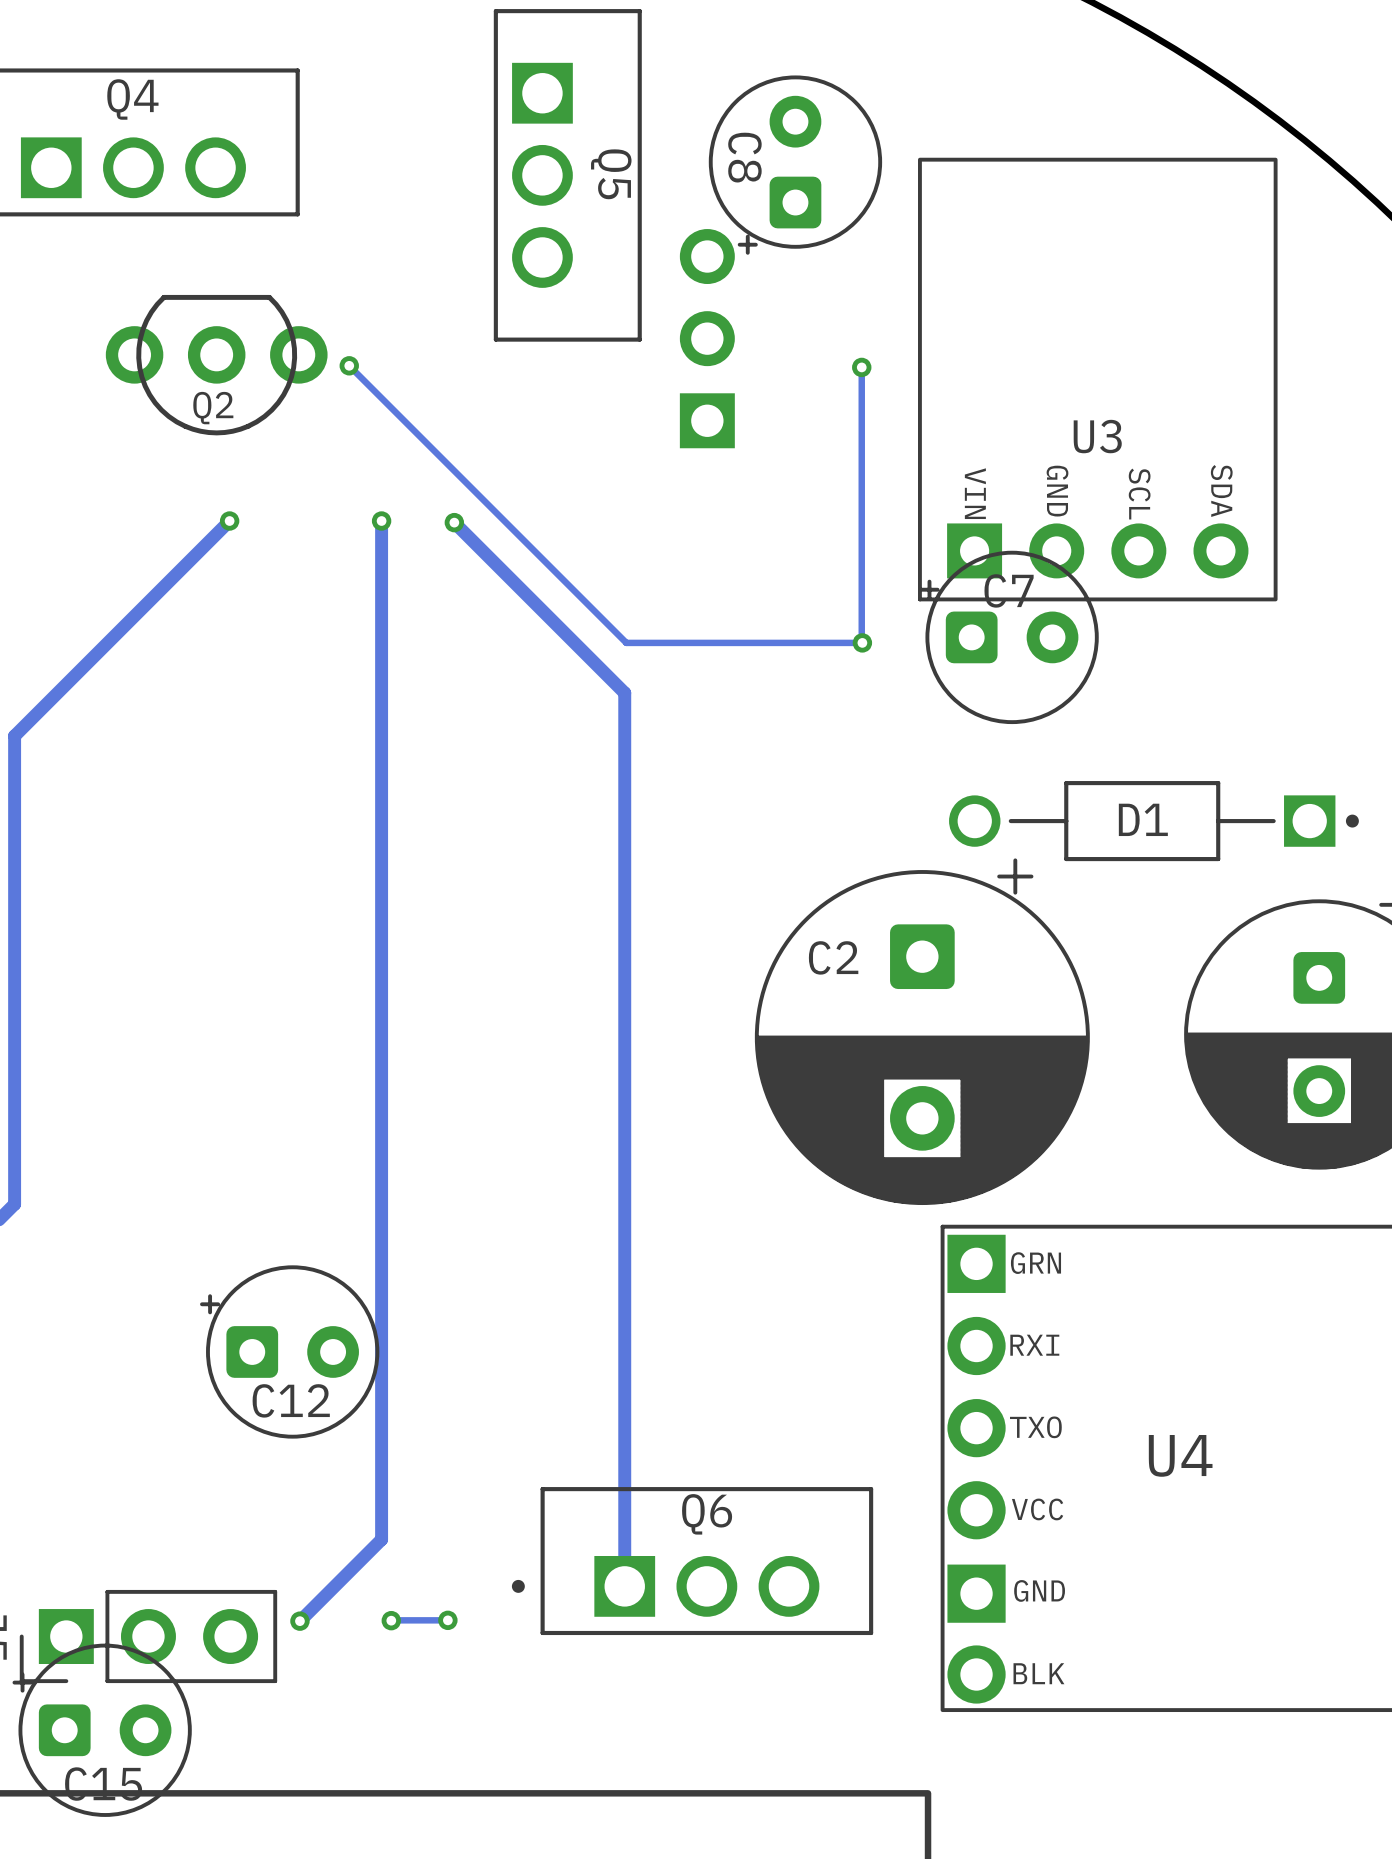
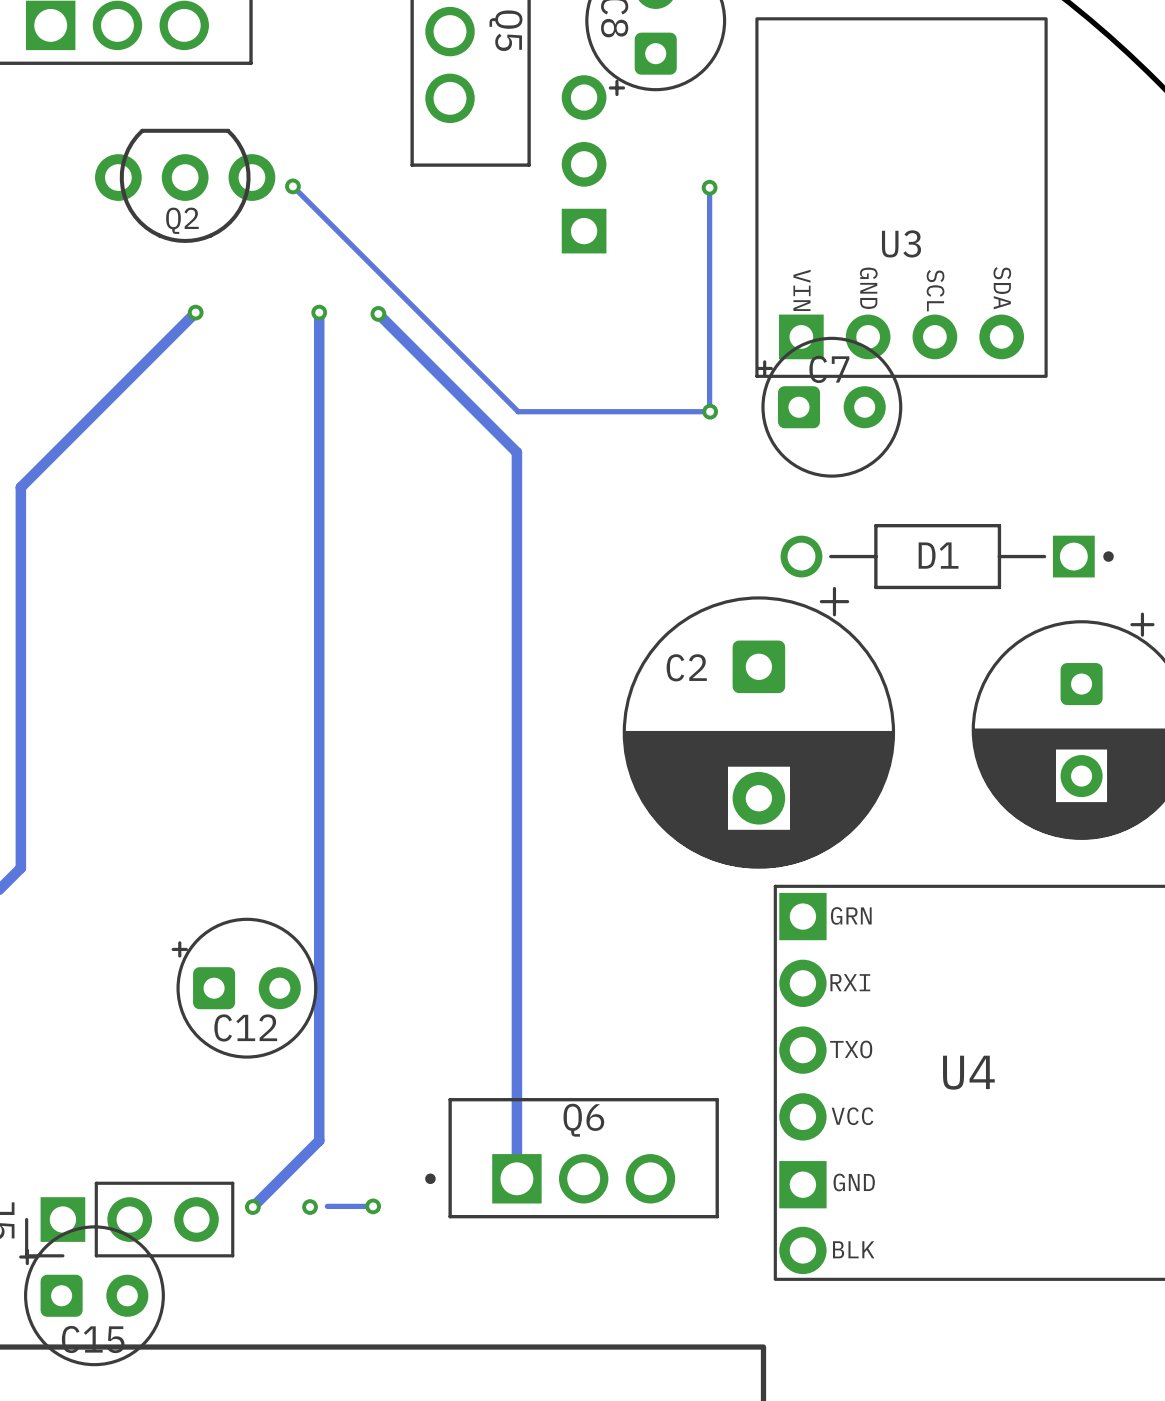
via position: (391, 1620) -> (310, 1207)

